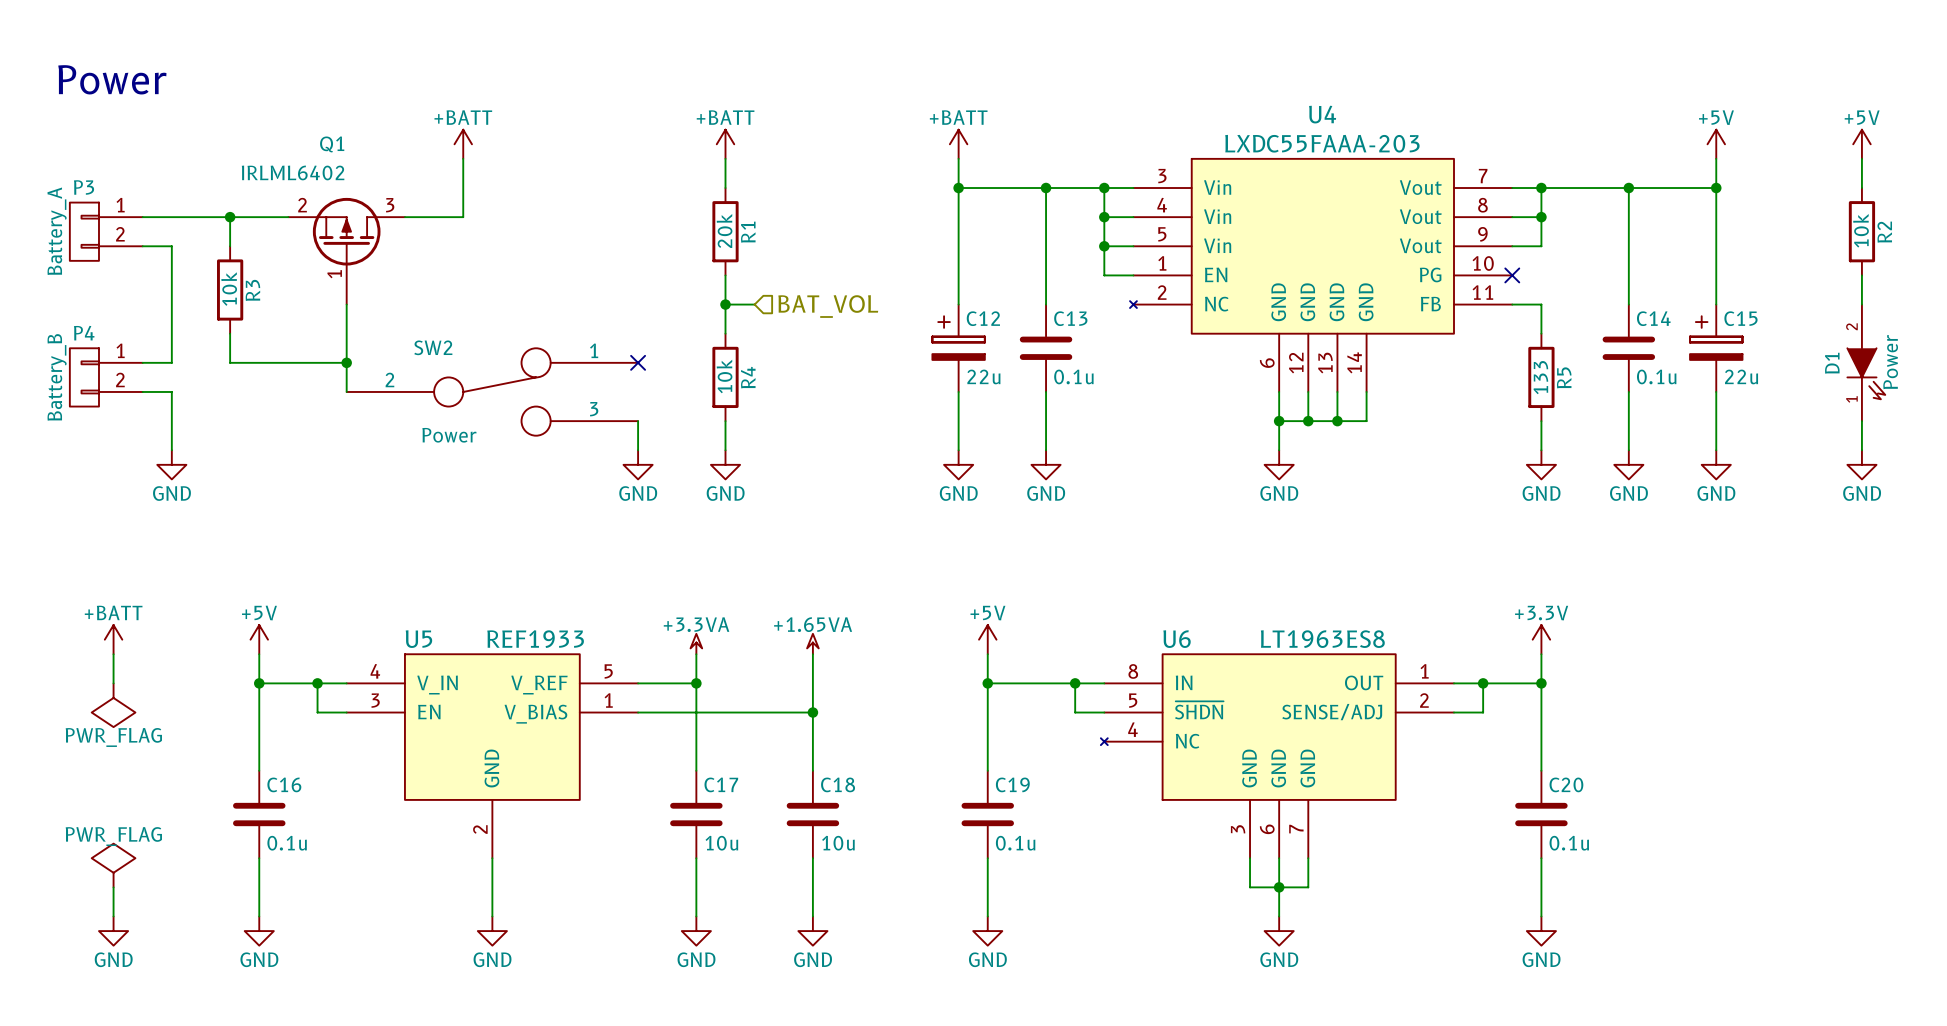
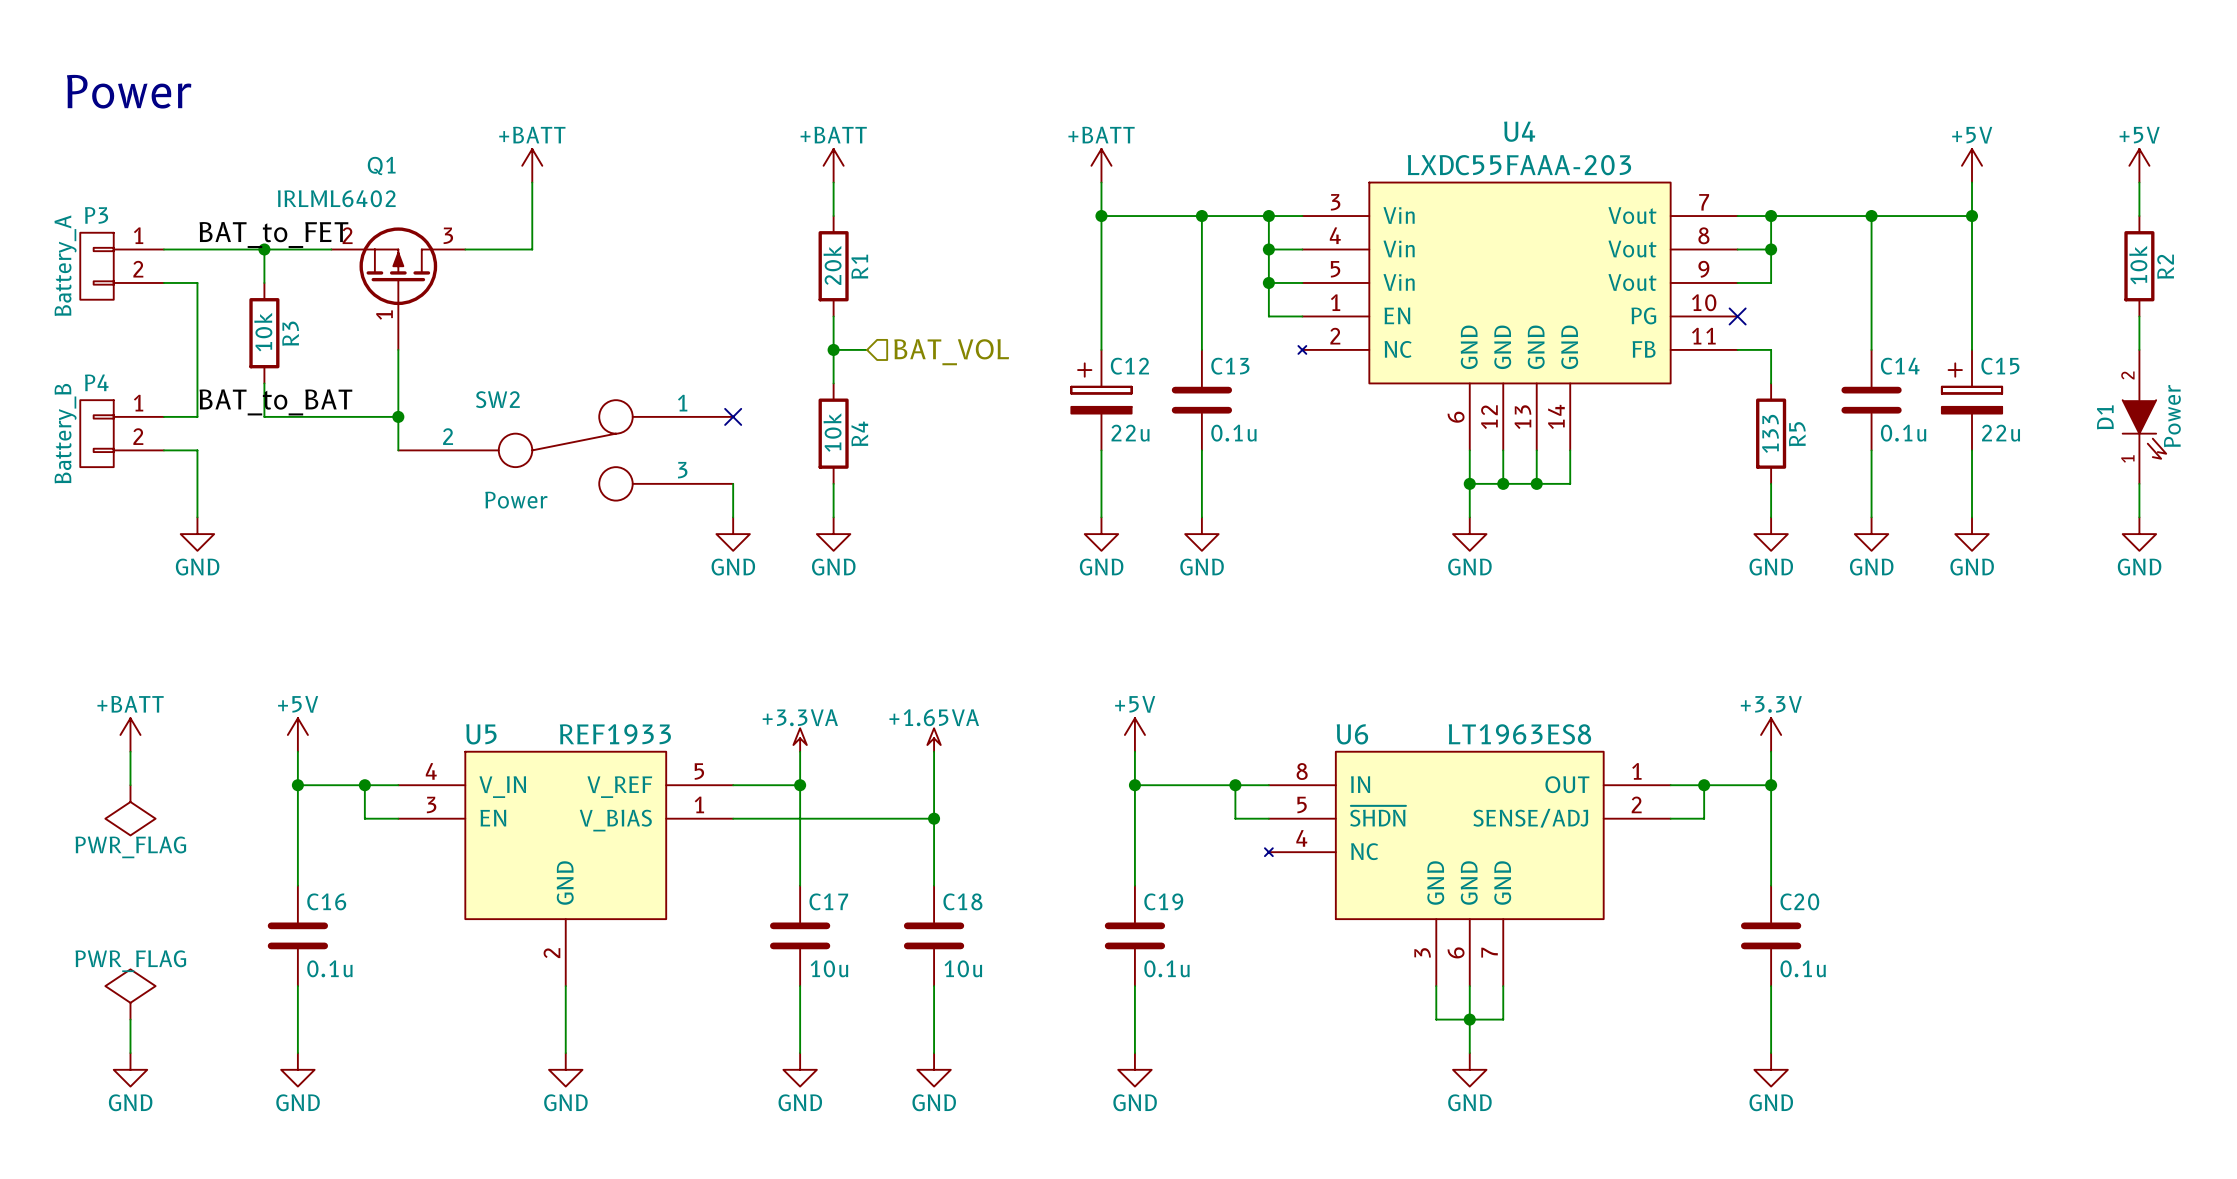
label: none -> BAT_to_FET (273, 234)
label: none -> BAT_to_BAT (275, 402)

